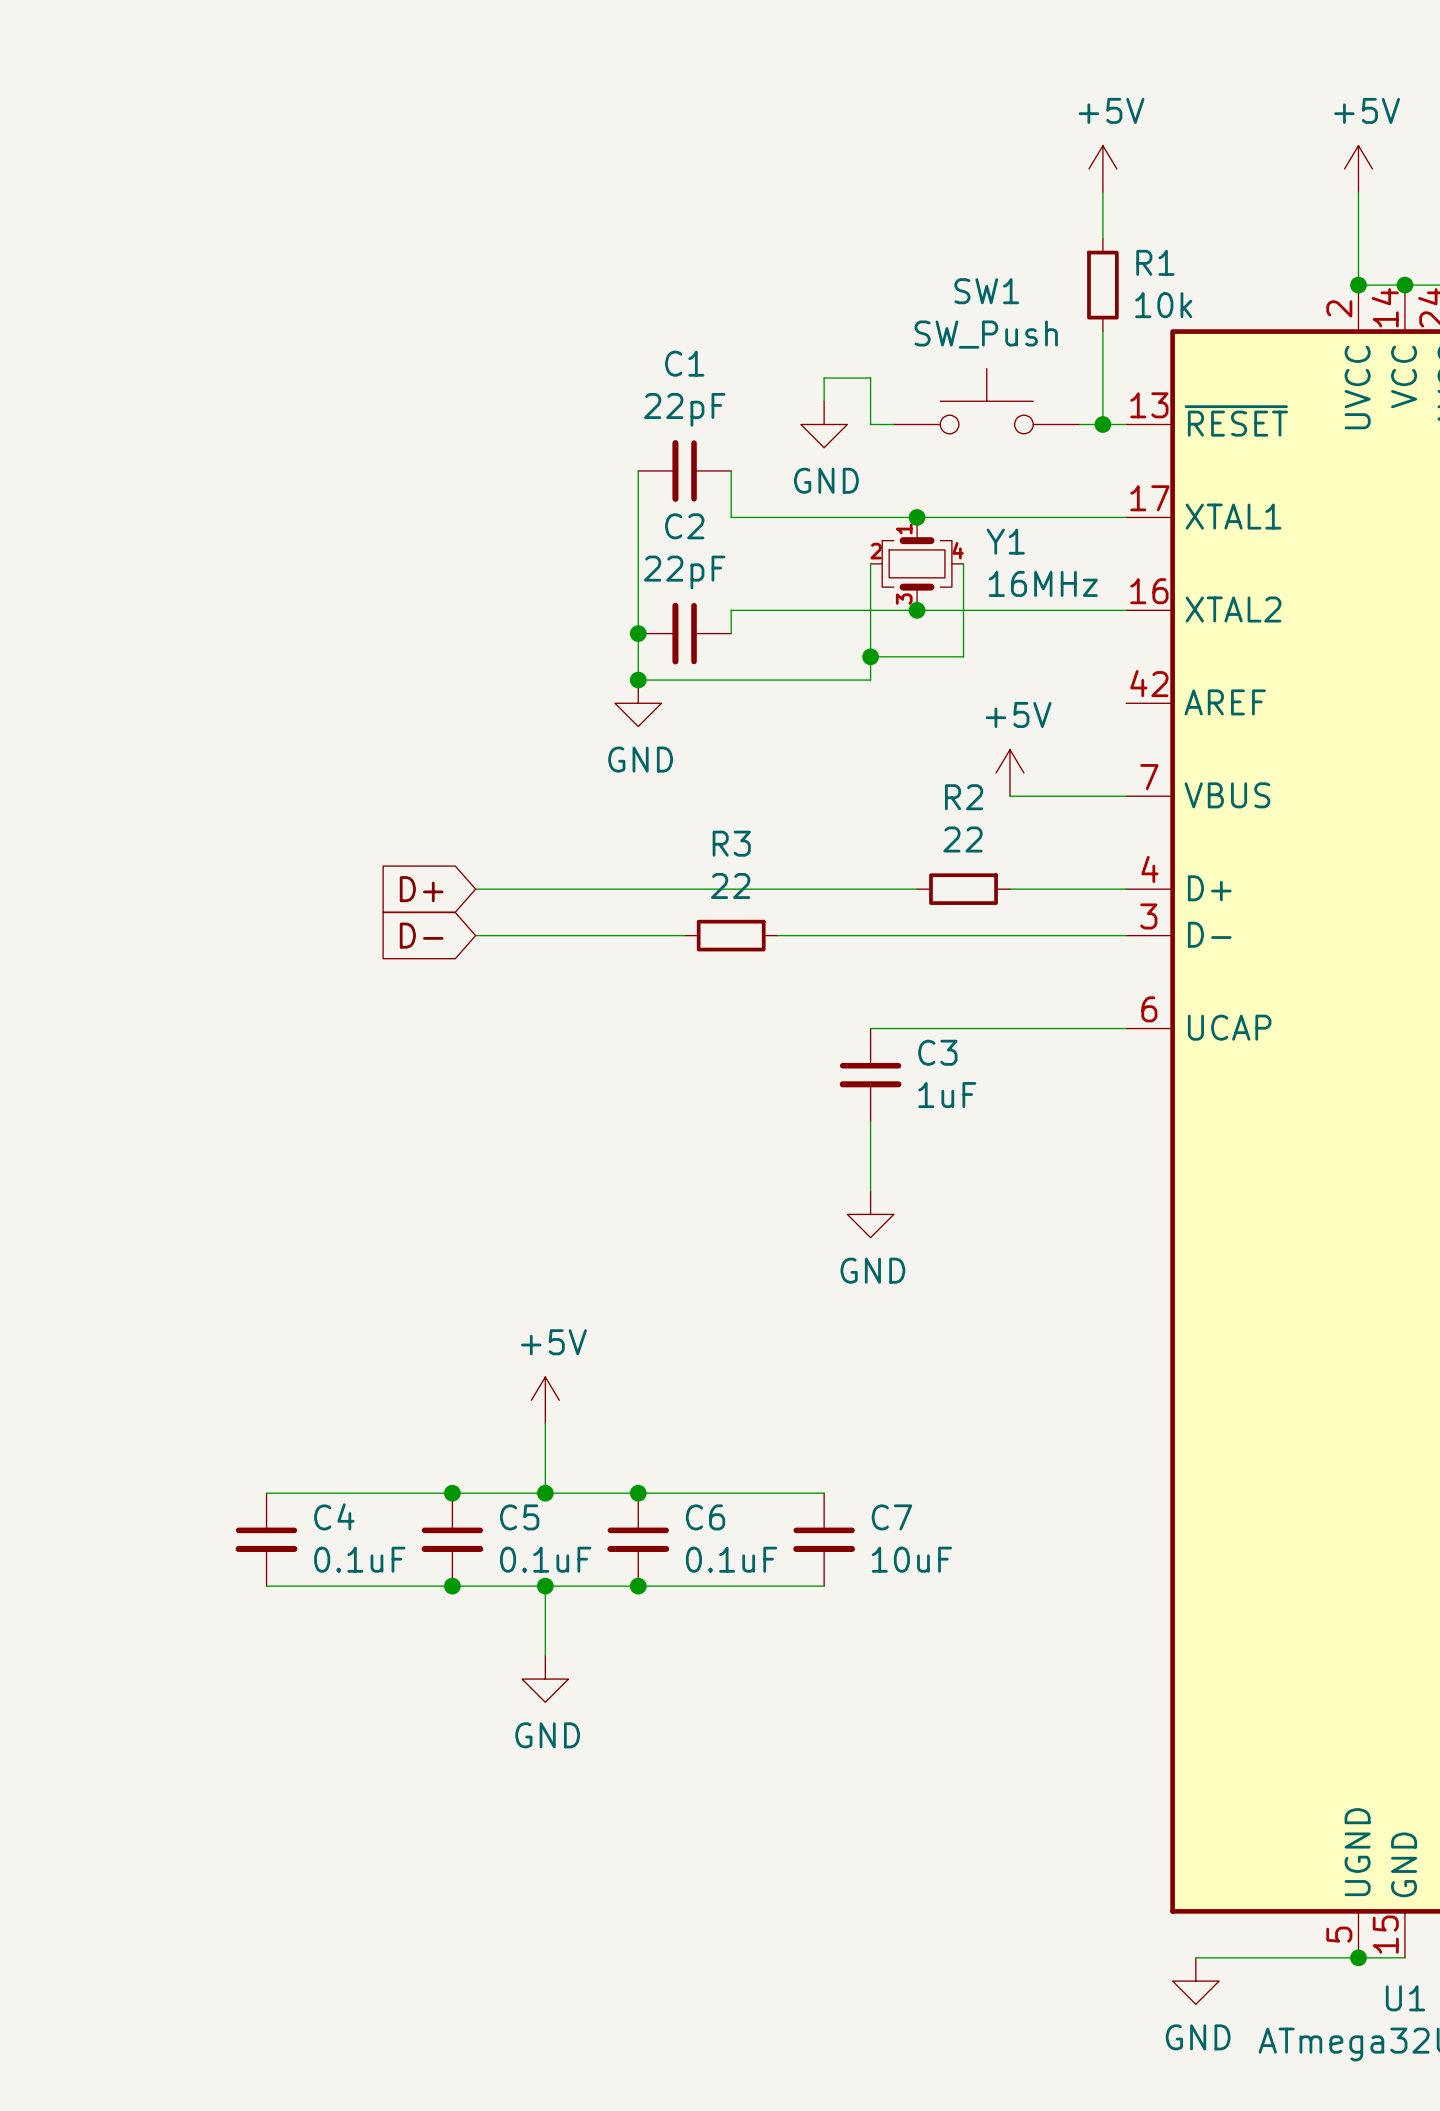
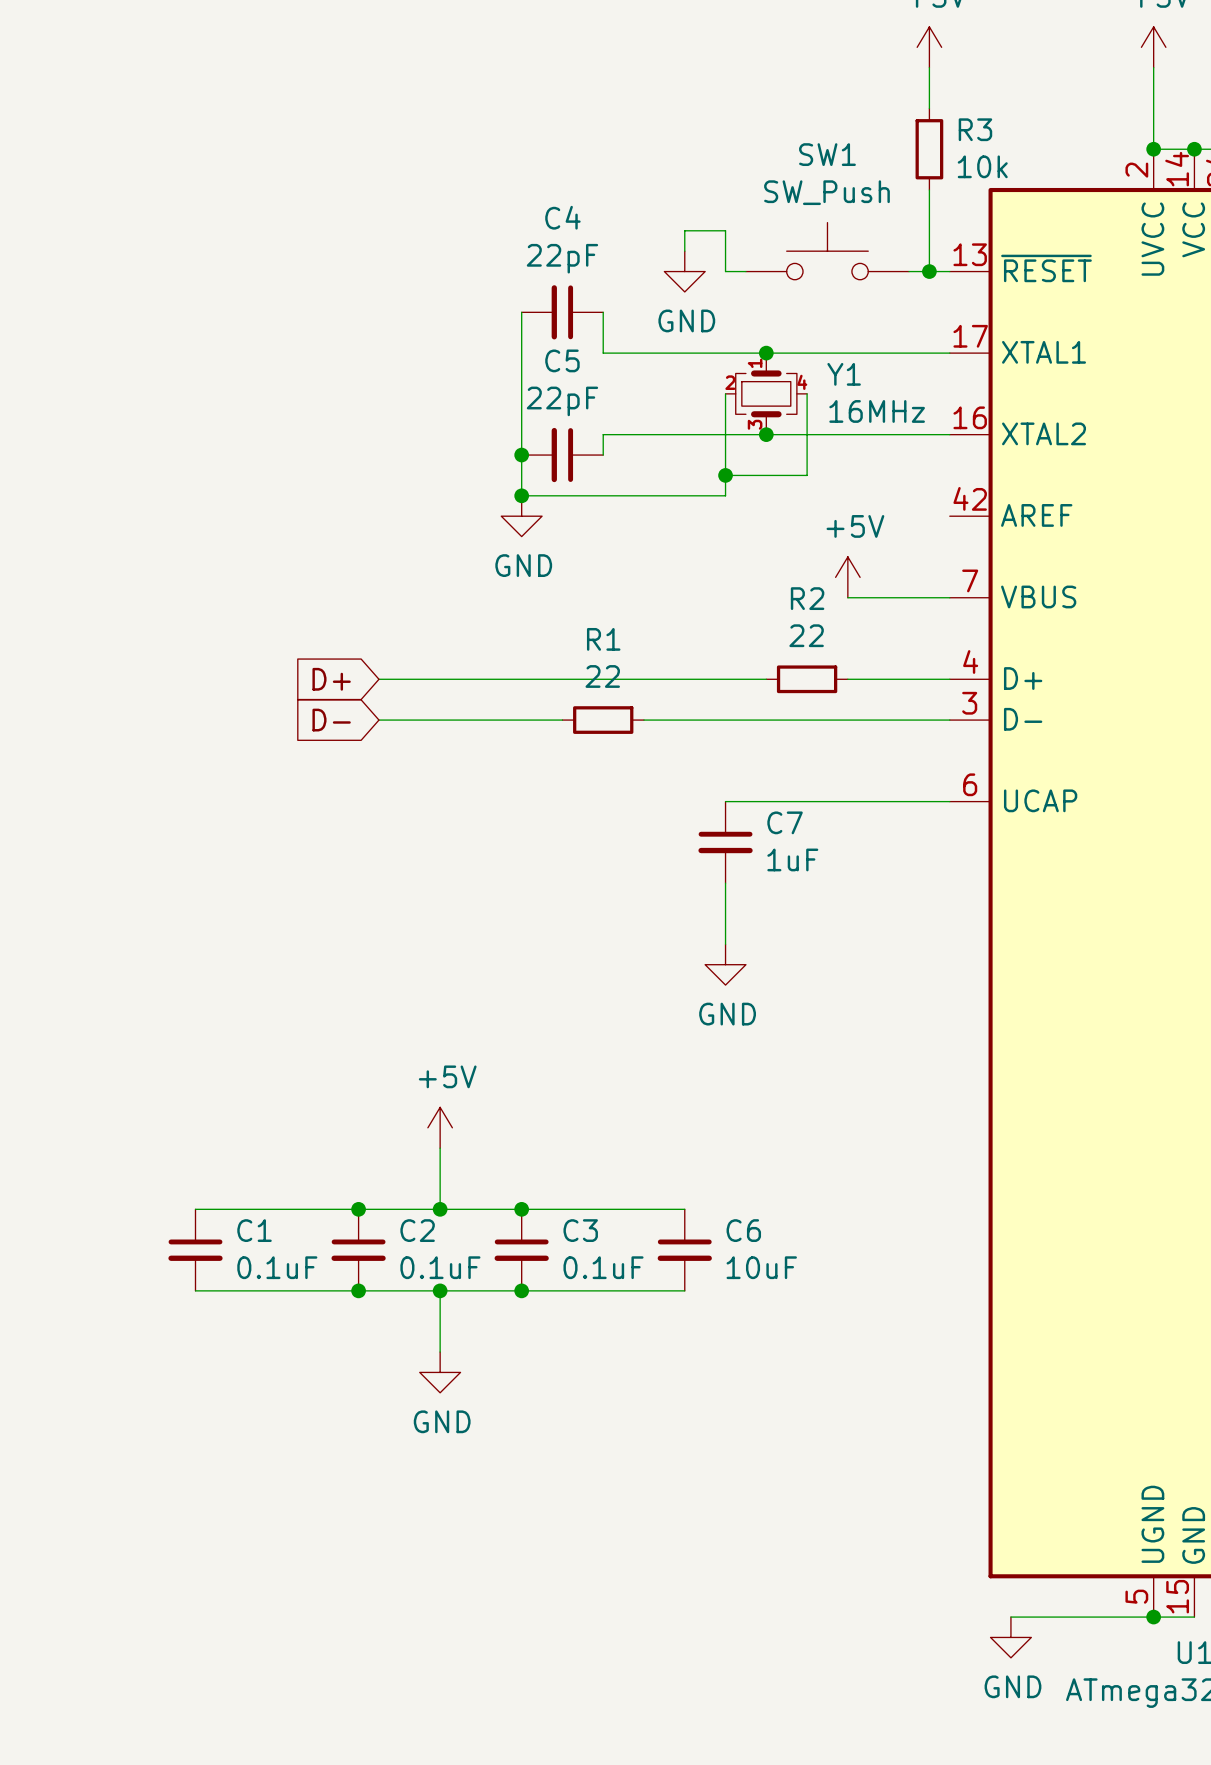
R1 name: R1 (1155, 262) -> R3 (975, 129)
C1 name: C1 (684, 363) -> C4 (562, 217)
C2 name: C2 (684, 526) -> C5 (562, 360)
R3 name: R3 (731, 843) -> R1 (603, 639)
C3 name: C3 (937, 1052) -> C7 (785, 822)
C4 name: C4 (334, 1516) -> C1 (254, 1230)
C5 name: C5 (519, 1517) -> C2 (417, 1230)
C6 name: C6 (705, 1517) -> C3 (580, 1230)
C7 name: C7 (891, 1517) -> C6 (743, 1230)

